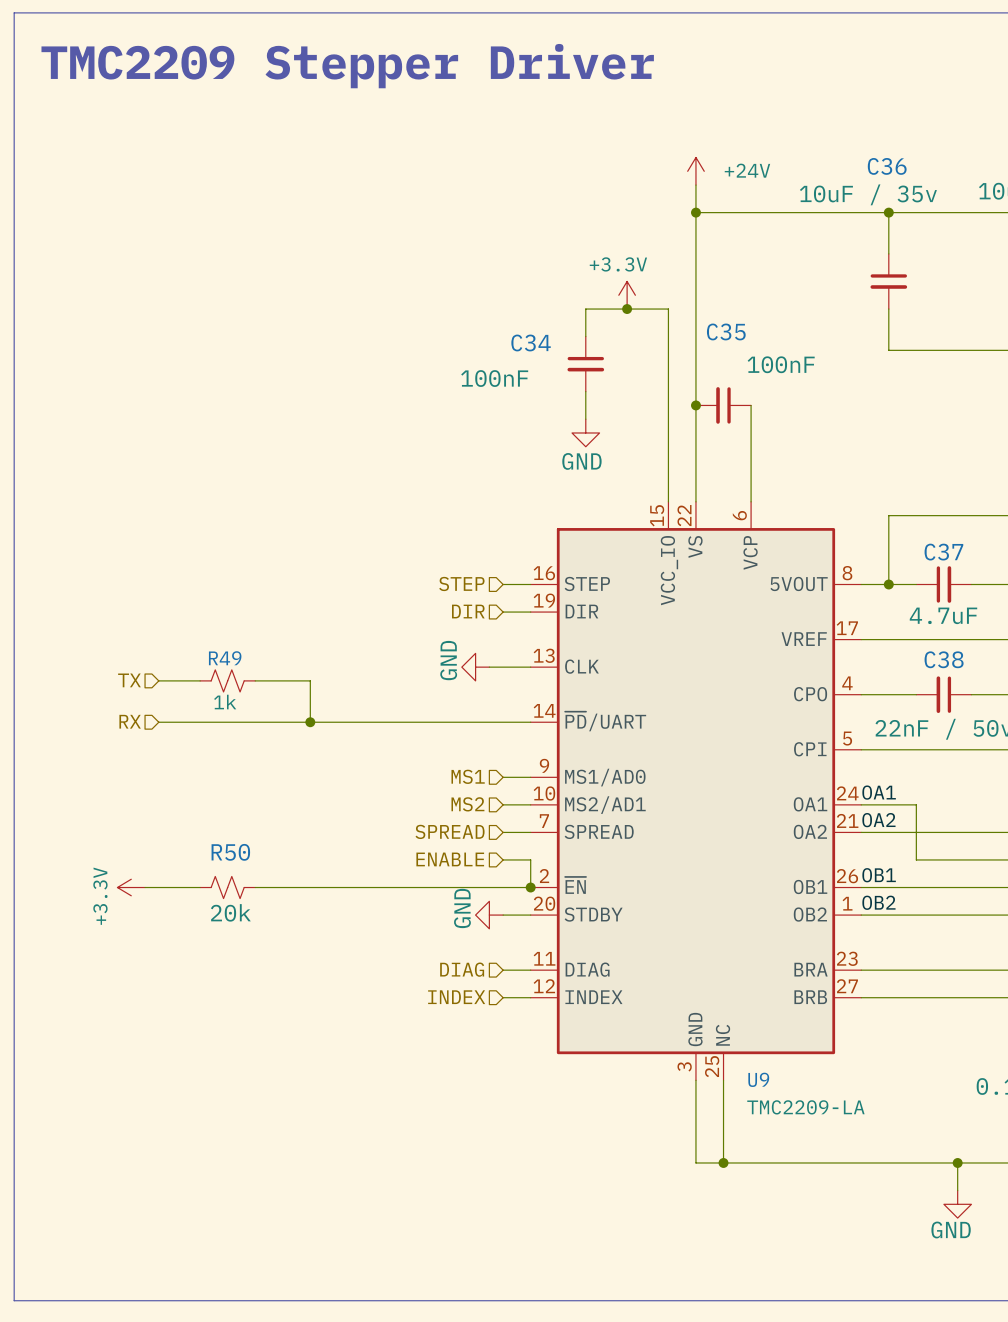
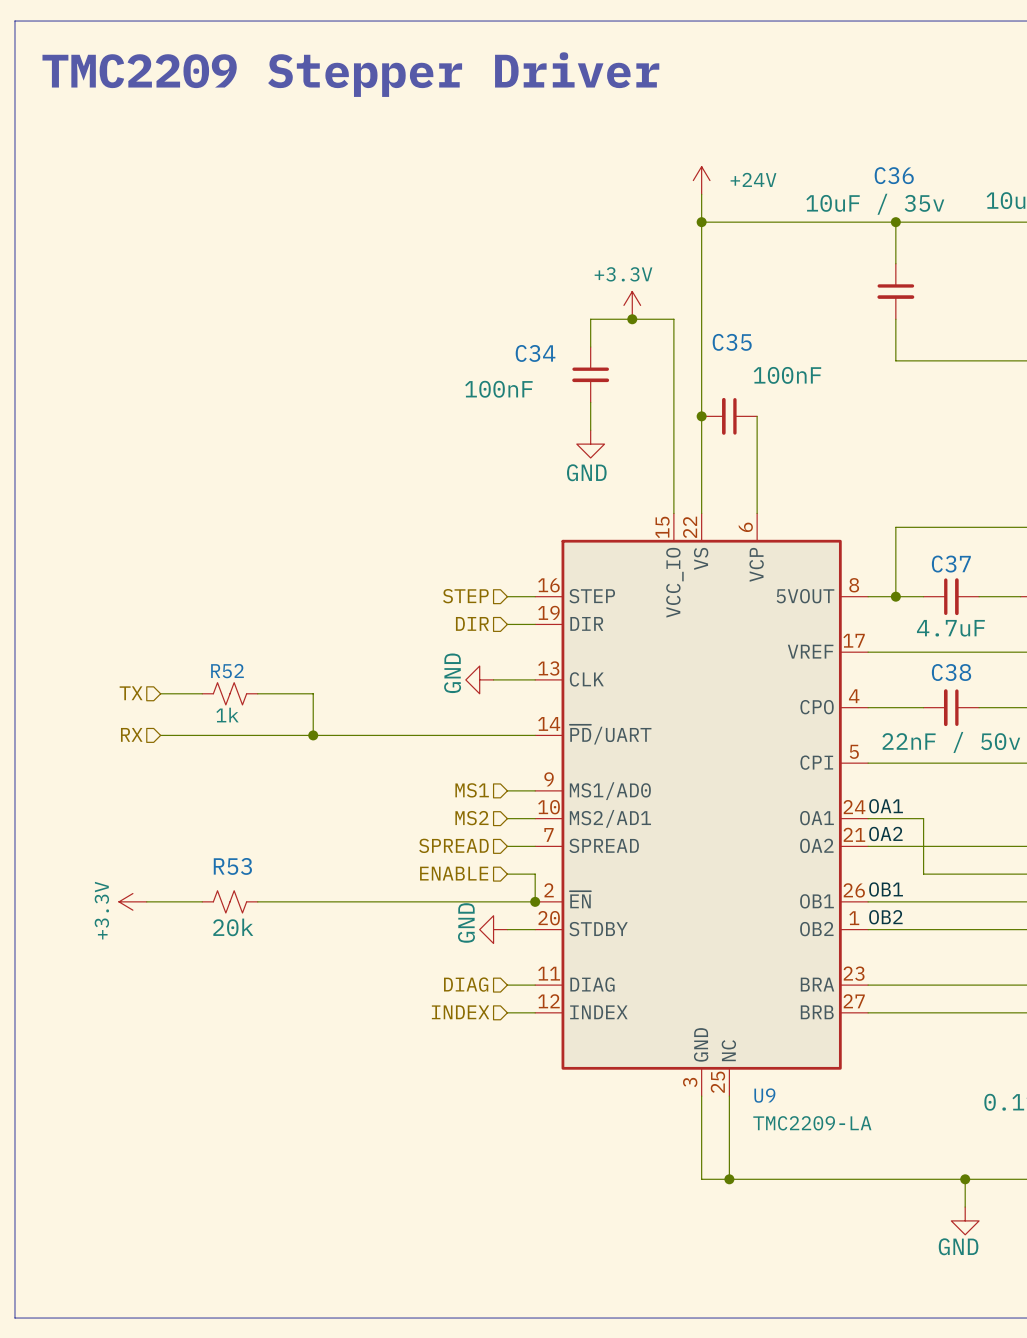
R49 name: R49 (225, 658) -> R52 (227, 671)
R50 name: R50 (230, 852) -> R53 (232, 866)

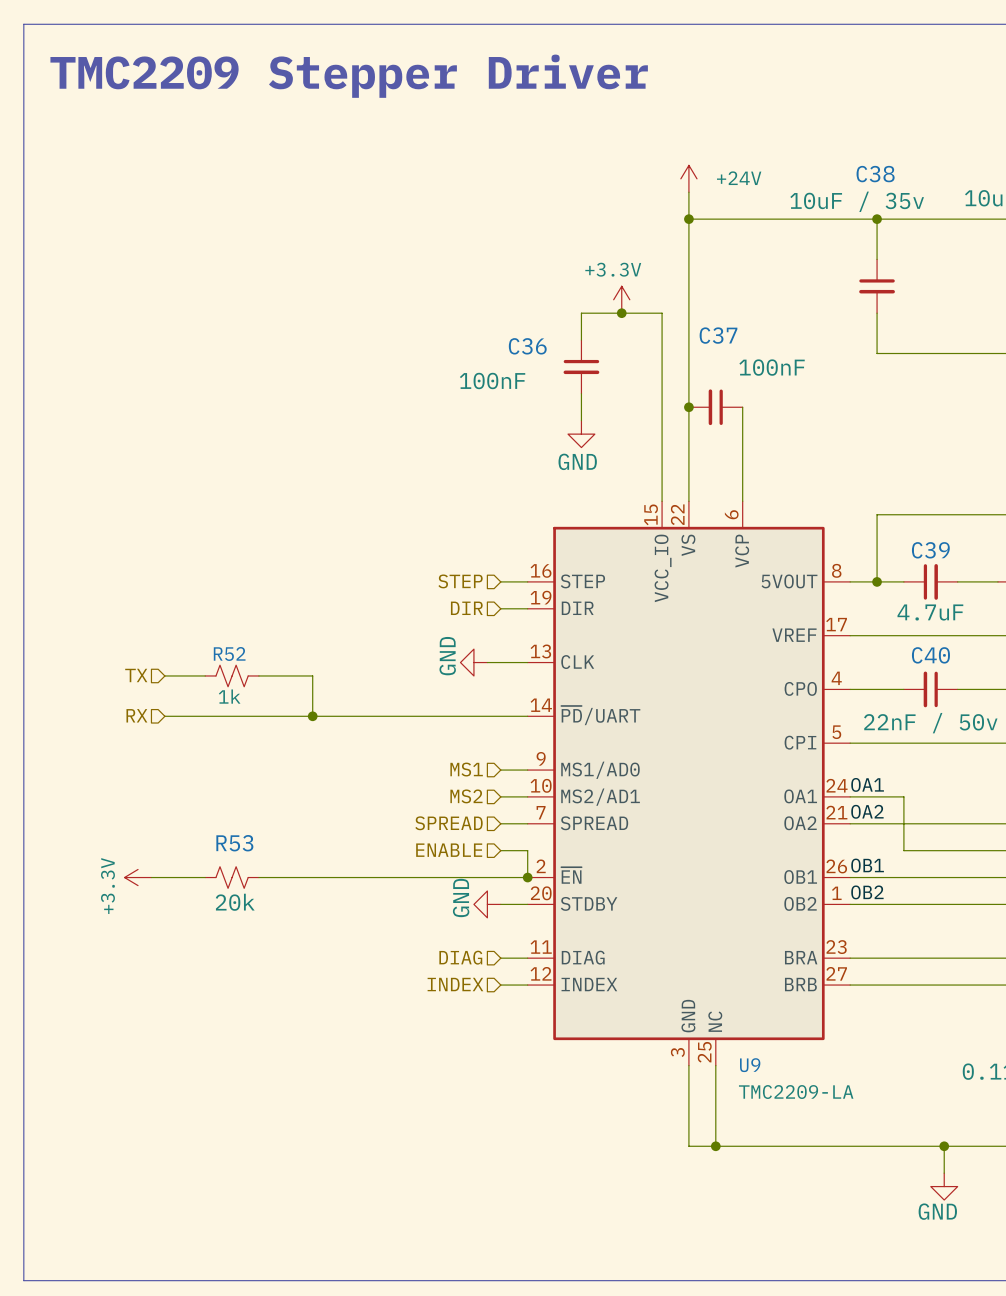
C36 name: C36 (894, 175) -> C38 (875, 174)
C35 name: C35 (732, 342) -> C37 (718, 335)
C34 name: C34 (535, 353) -> C36 (527, 346)
C37 name: C37 (951, 564) -> C39 (930, 550)
C38 name: C38 (951, 672) -> C40 (930, 655)

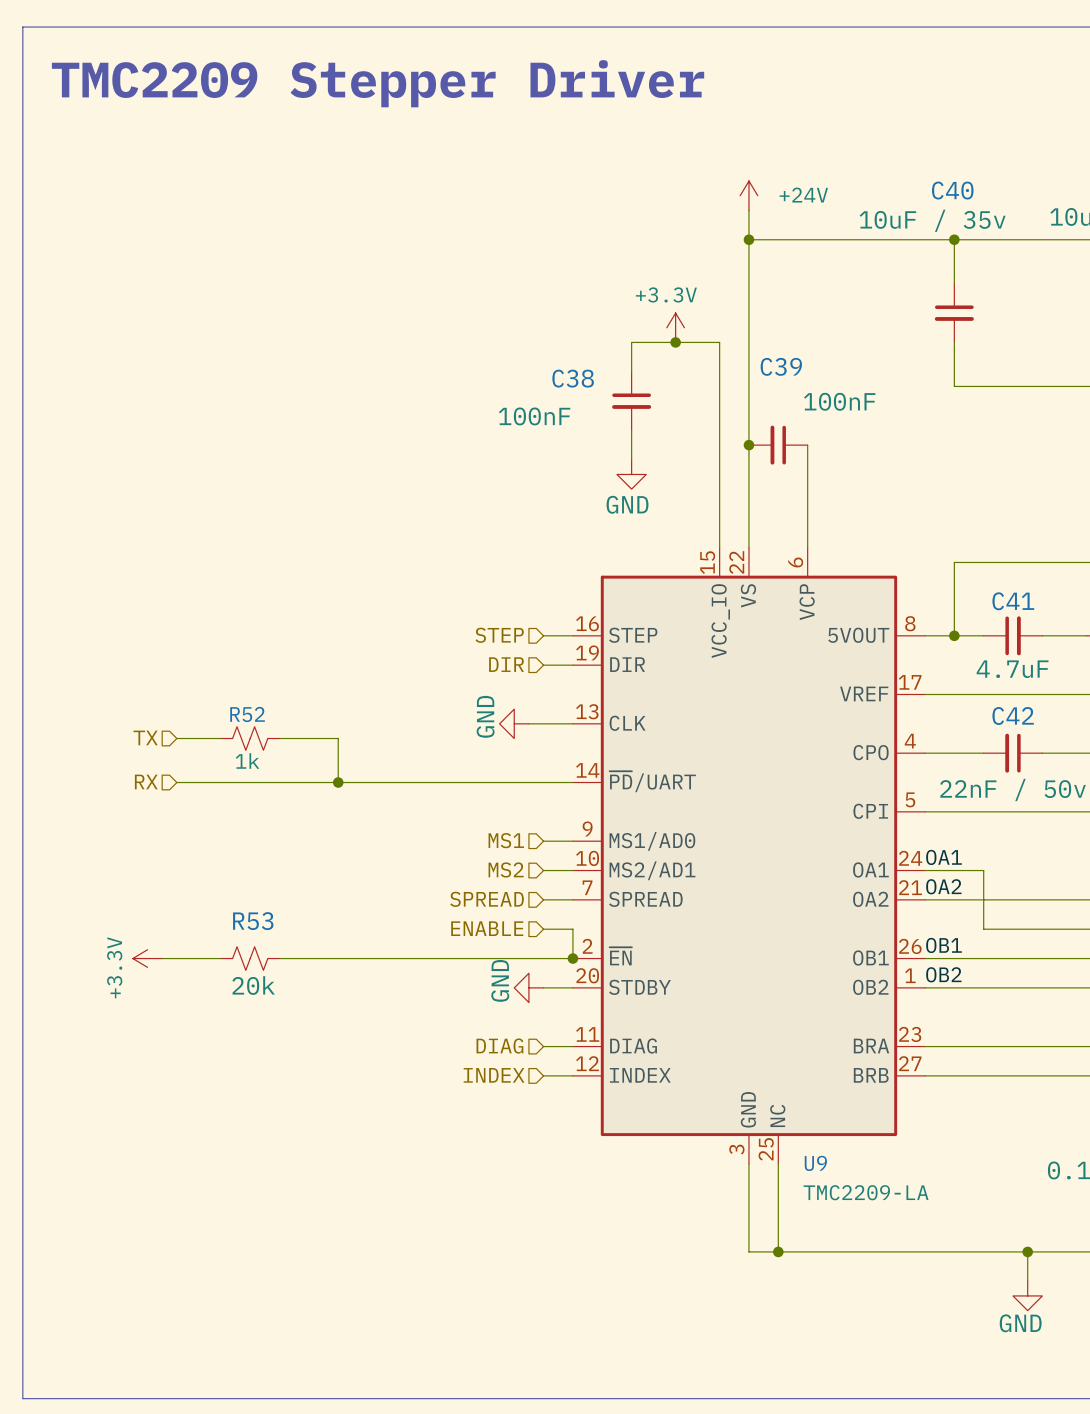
C38 name: C38 (875, 174) -> C40 (952, 190)
C37 name: C37 (718, 335) -> C39 (781, 366)
C36 name: C36 (527, 346) -> C38 (573, 378)
C39 name: C39 (930, 550) -> C41 (1013, 601)
C40 name: C40 (930, 655) -> C42 (1013, 716)

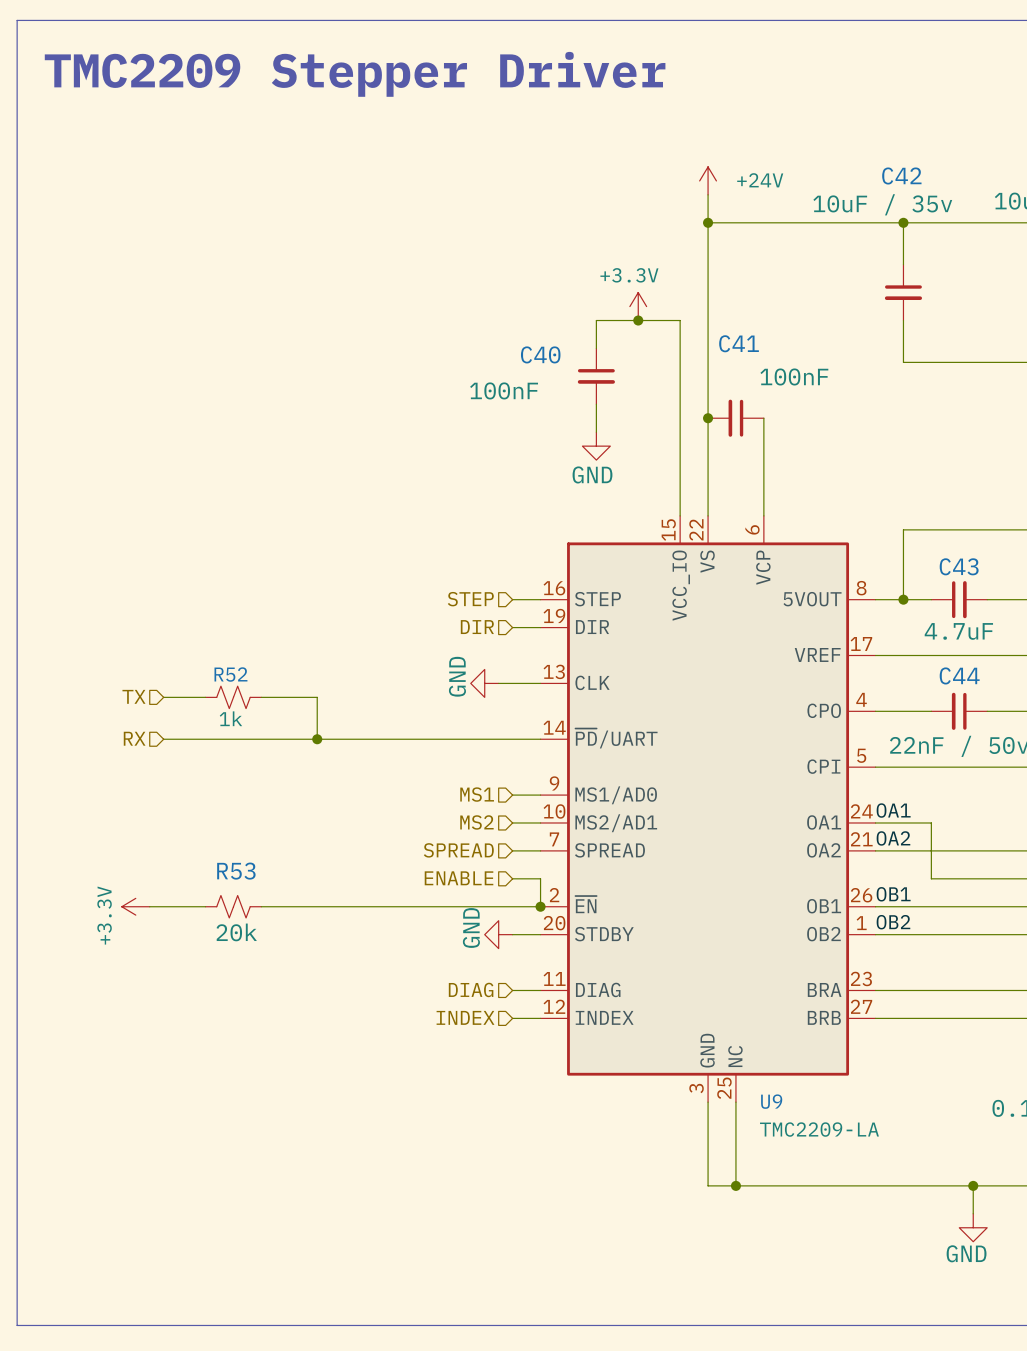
C40 name: C40 (952, 190) -> C42 (901, 176)
C39 name: C39 (781, 366) -> C41 (739, 343)
C38 name: C38 (573, 378) -> C40 (540, 354)
C41 name: C41 (1013, 601) -> C43 (959, 566)
C42 name: C42 (1013, 716) -> C44 (959, 675)

